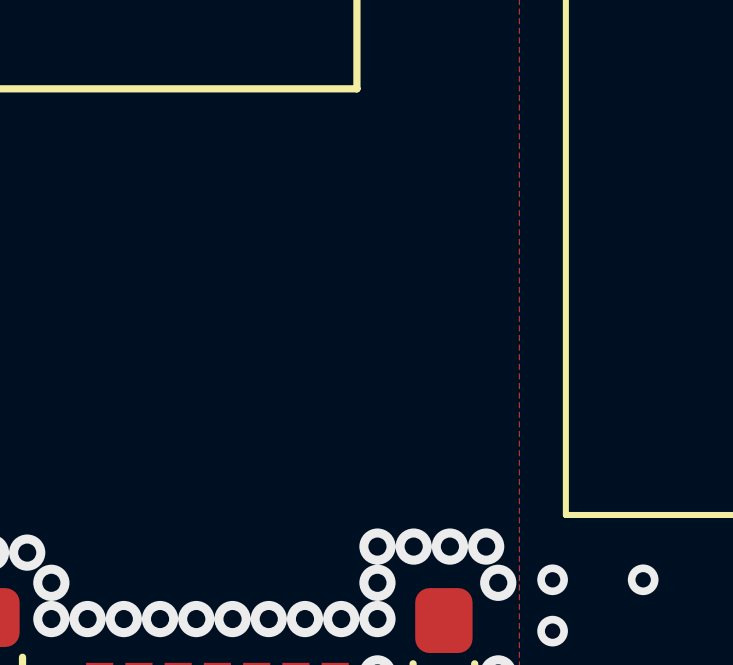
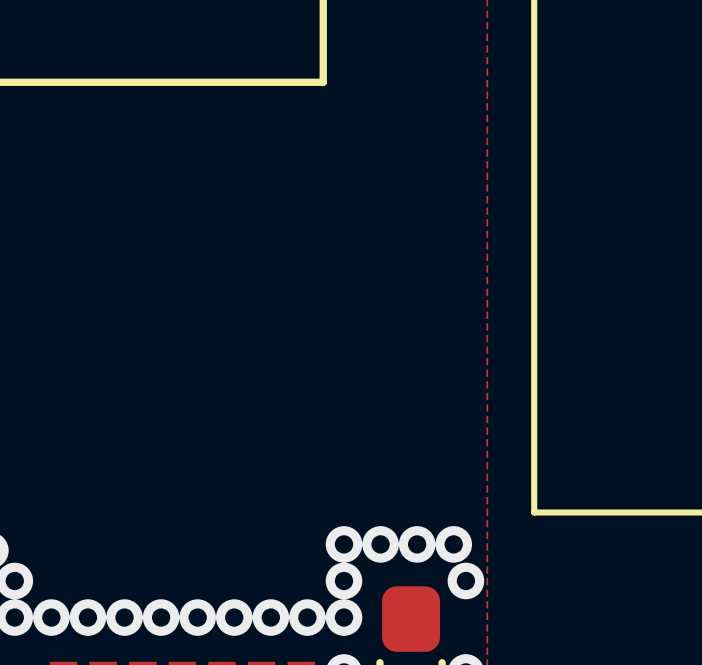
via: (552, 579) -> none
via: (643, 579) -> none
via: (552, 631) -> none

